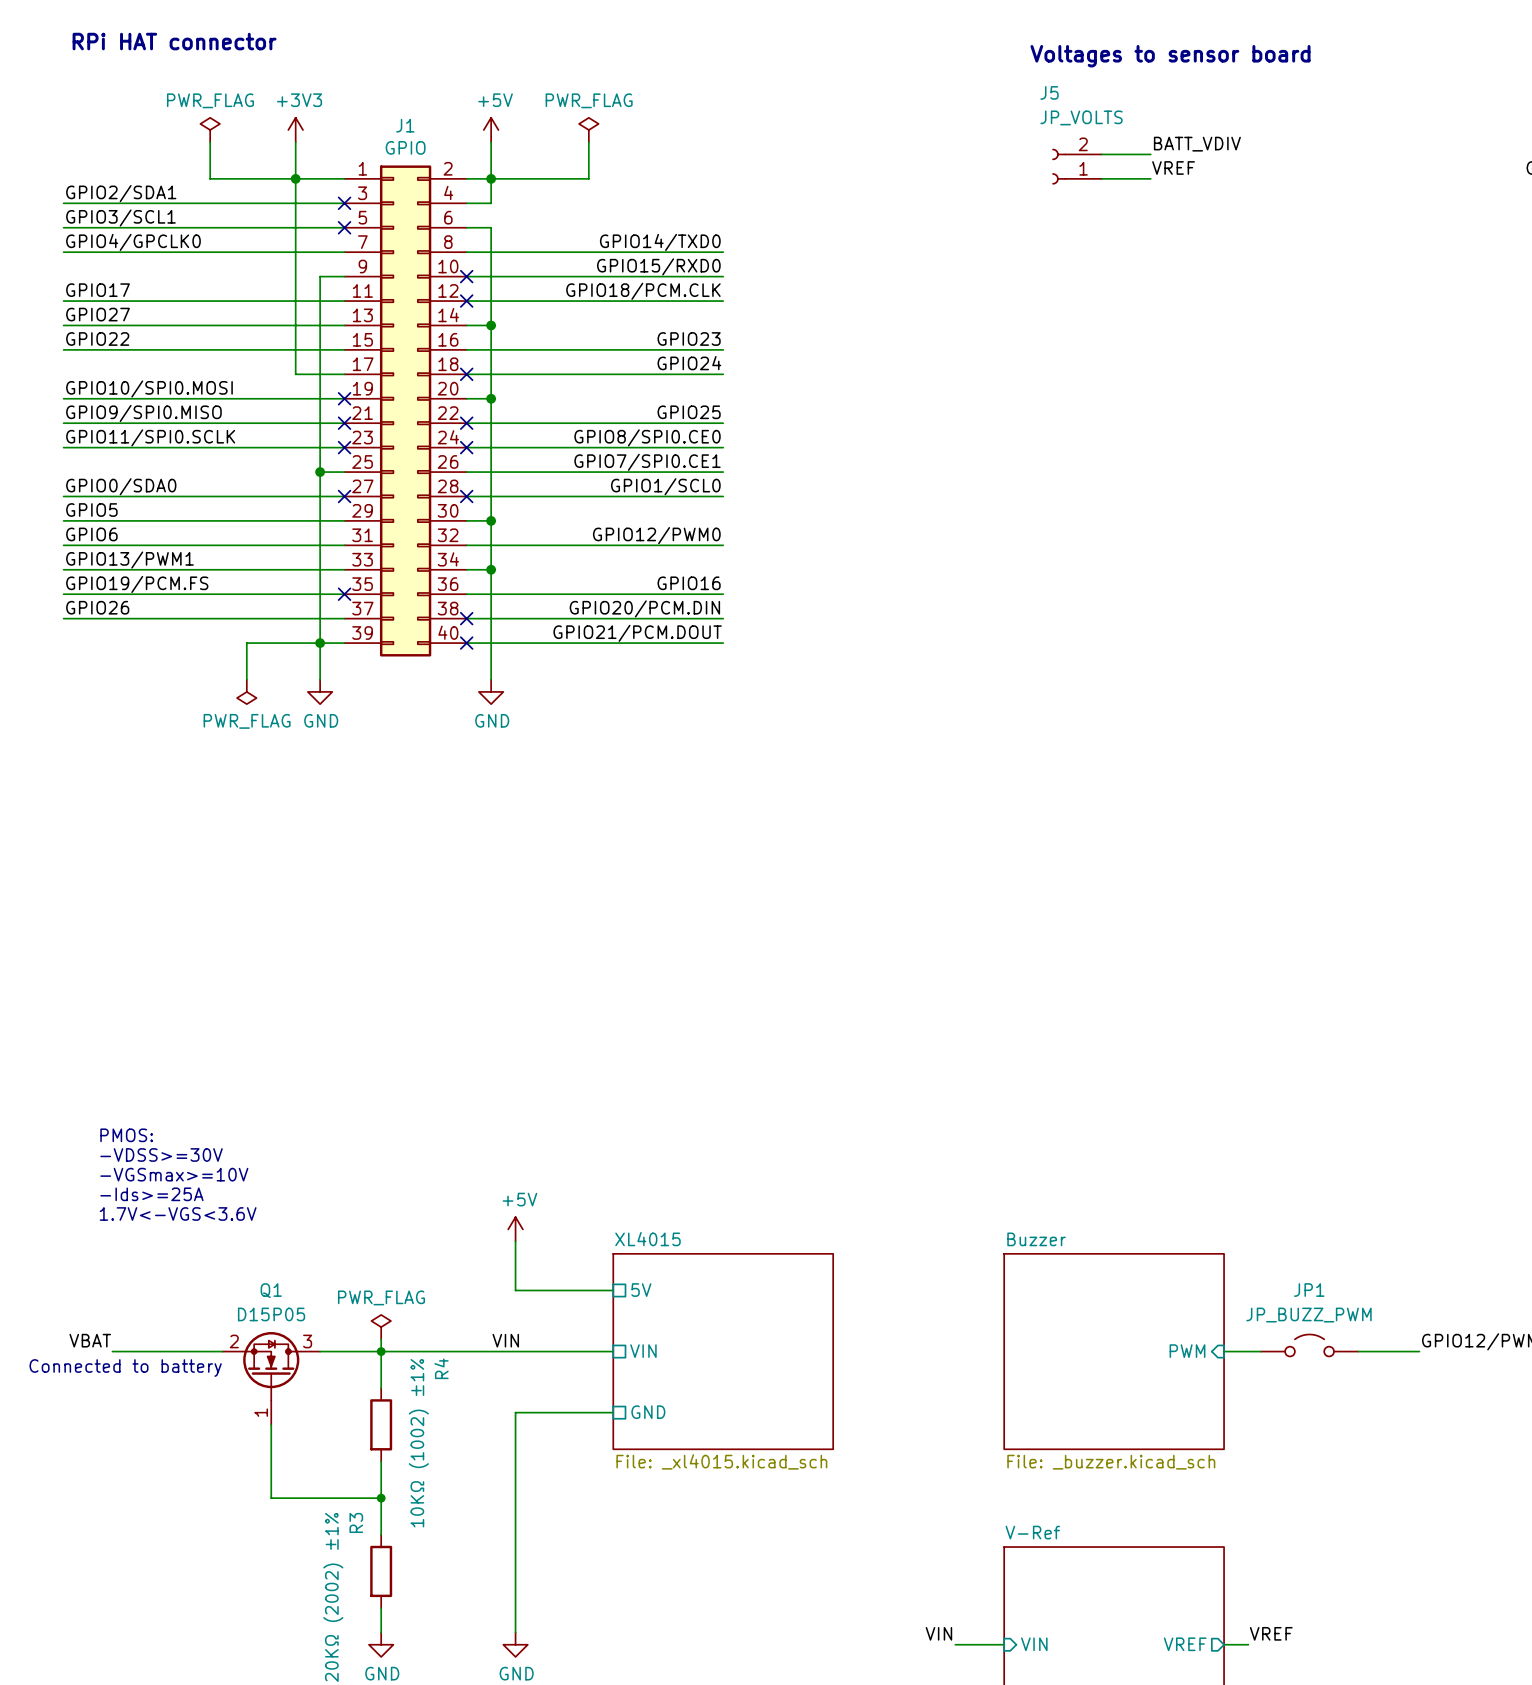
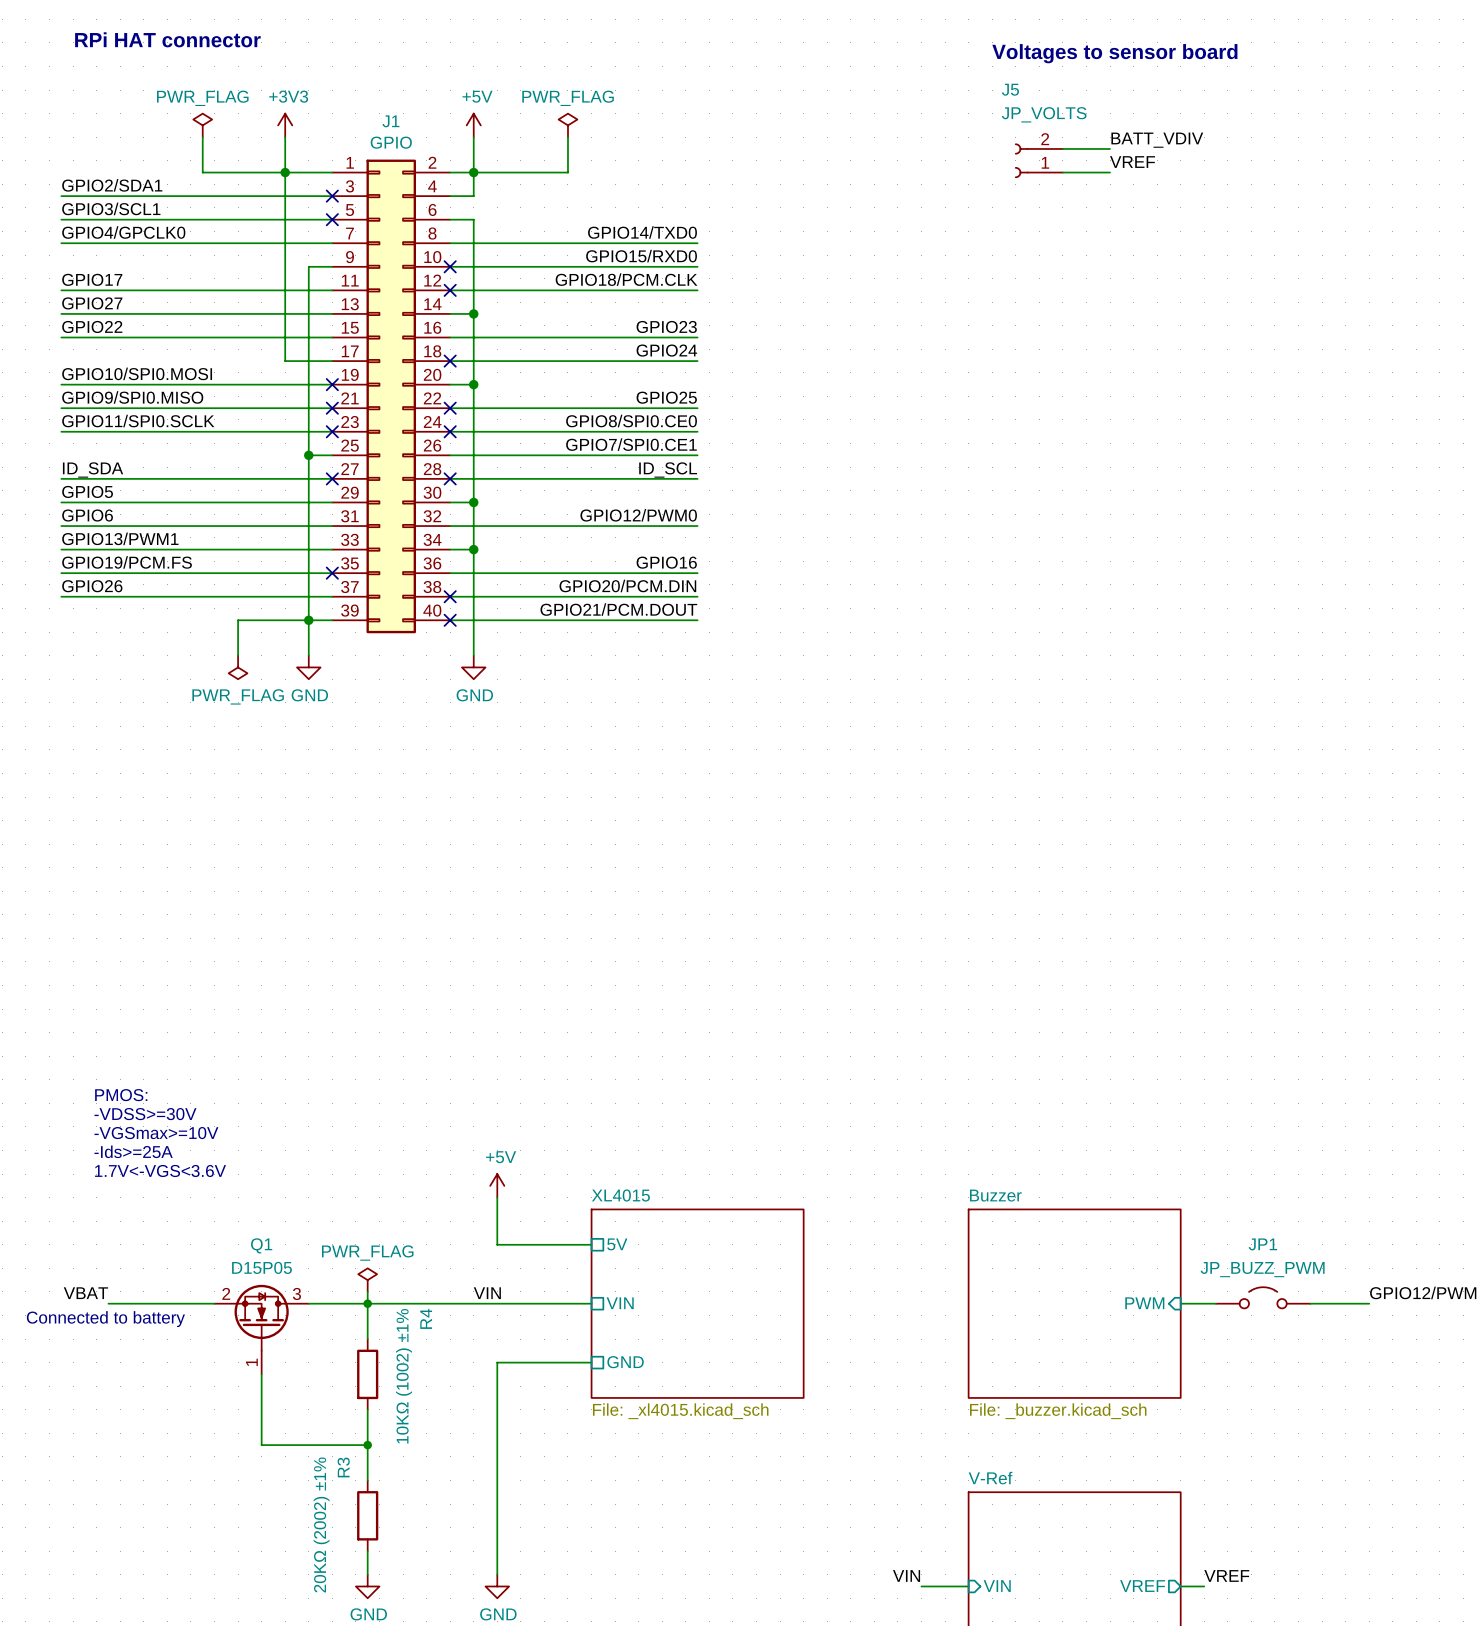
label: GPIO0/SDA0 (121, 486) -> ID_SDA (93, 470)
label: GPIO1/SCL0 (665, 486) -> ID_SCL (668, 470)

